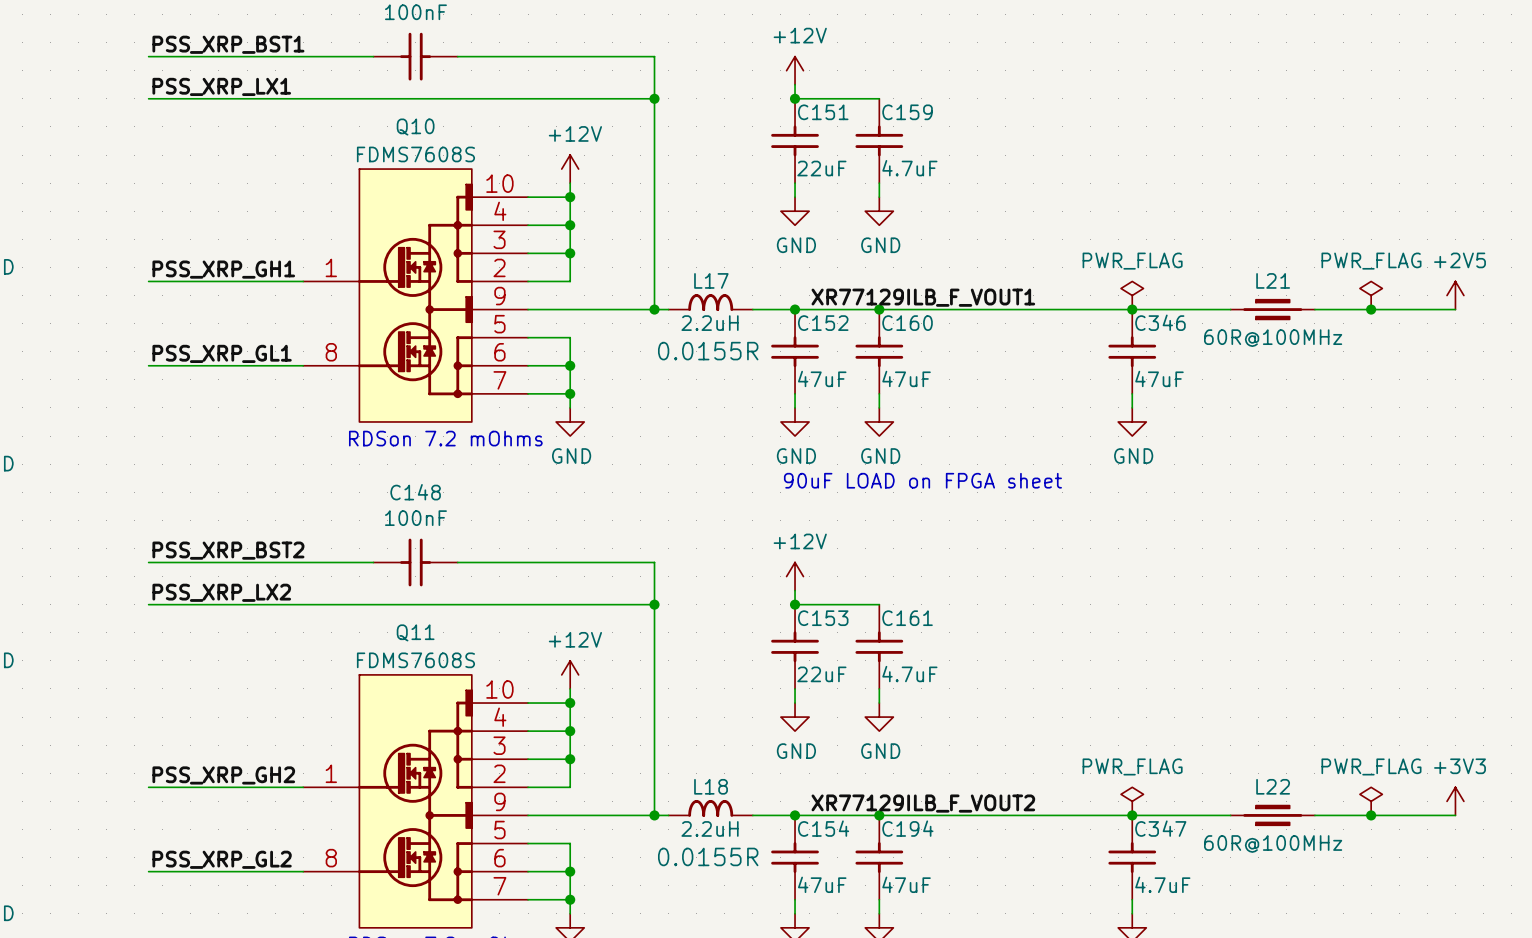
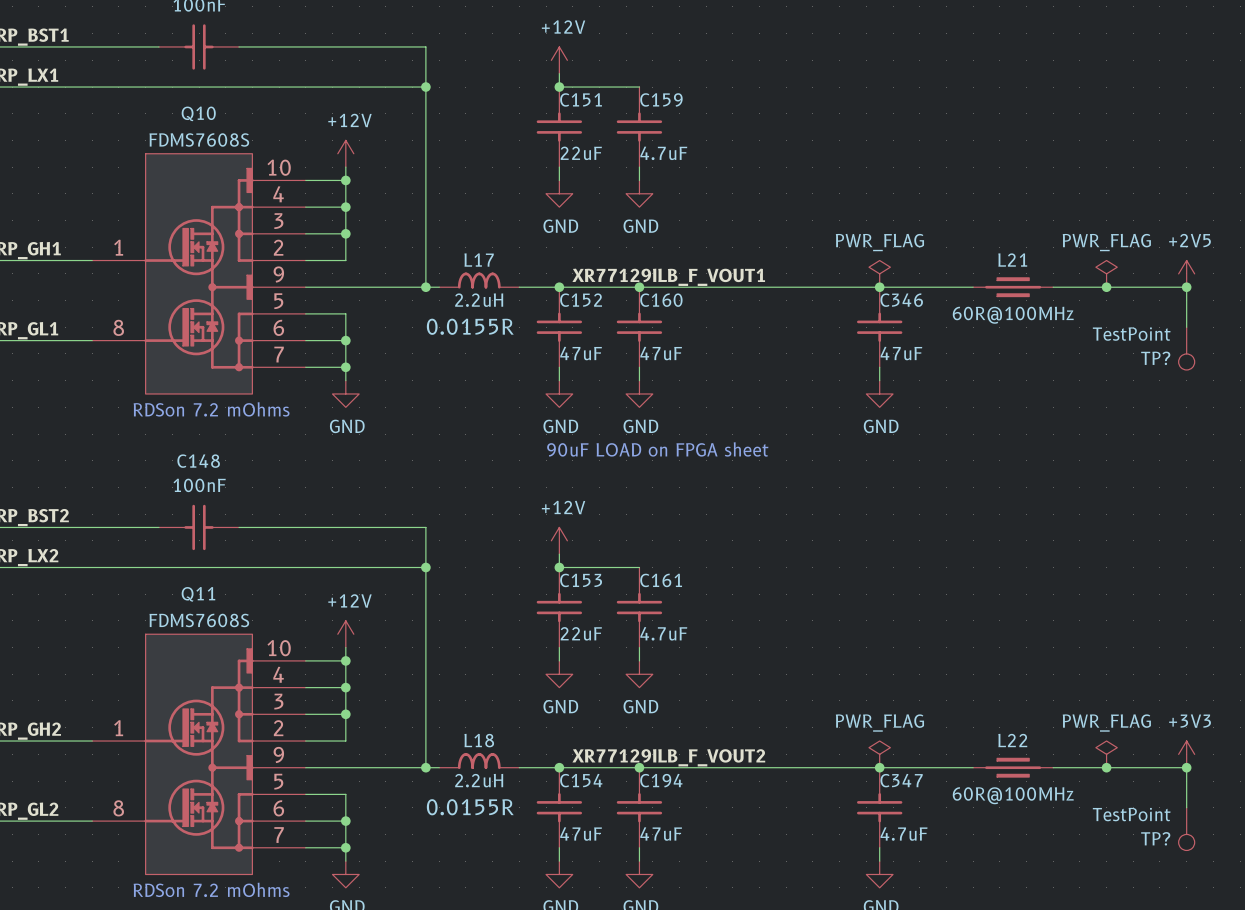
wire: none -> (1186, 287) (1186, 327)
junction: none -> (1186, 287)
TP?: none -> TestPoint (1186, 348)
wire: none -> (1186, 767) (1186, 807)
junction: none -> (1186, 767)
TP?: none -> TestPoint (1186, 829)

